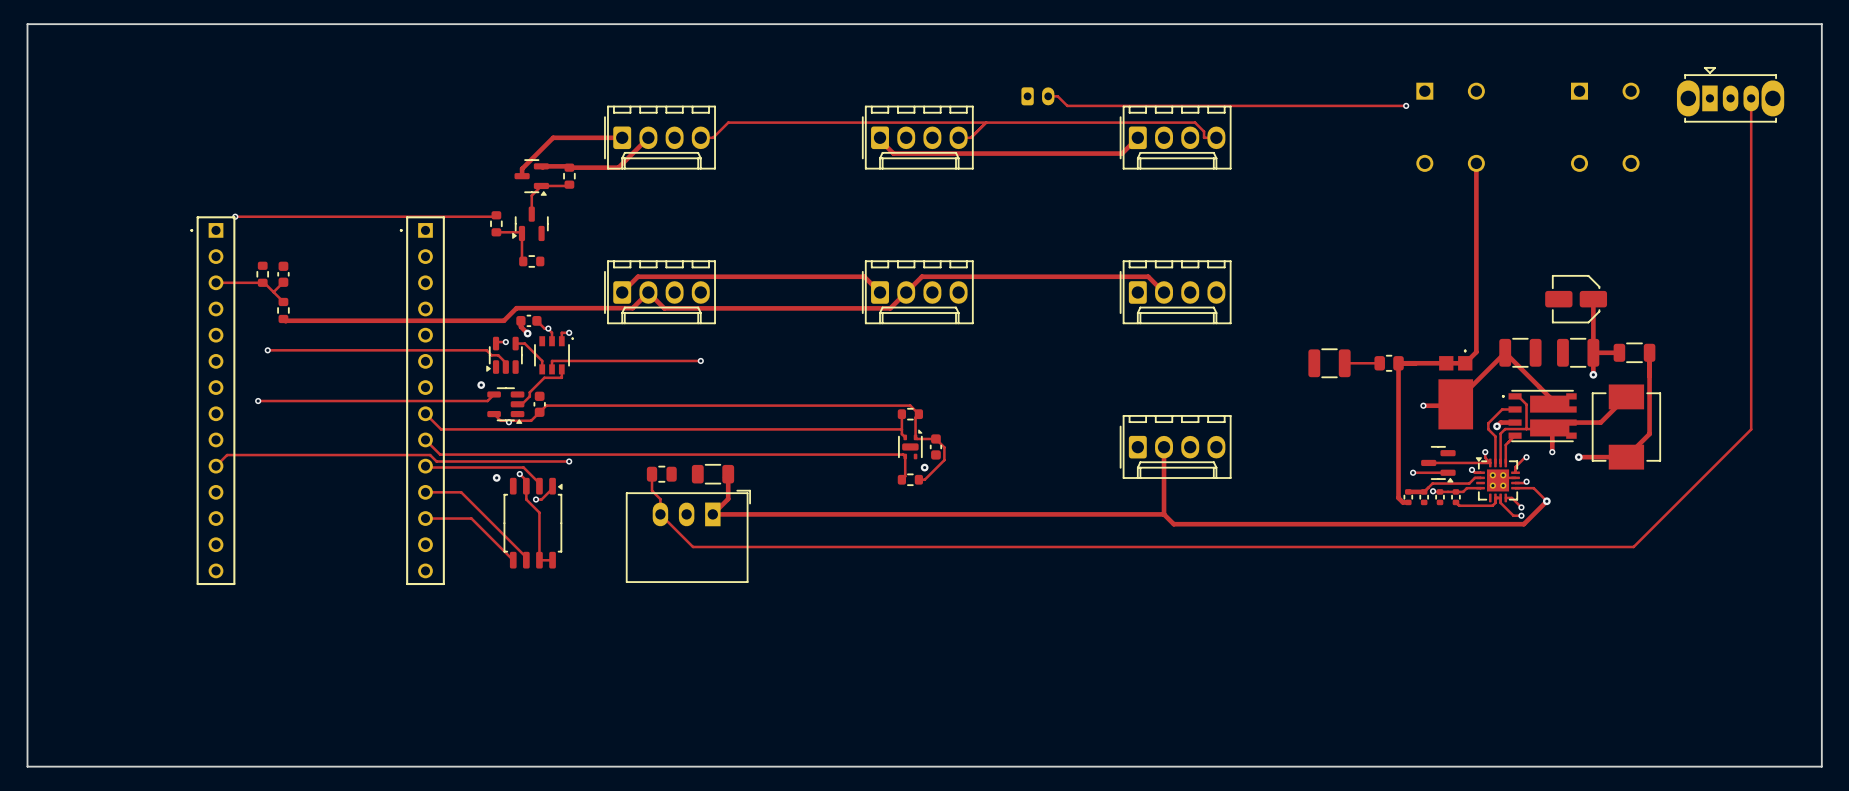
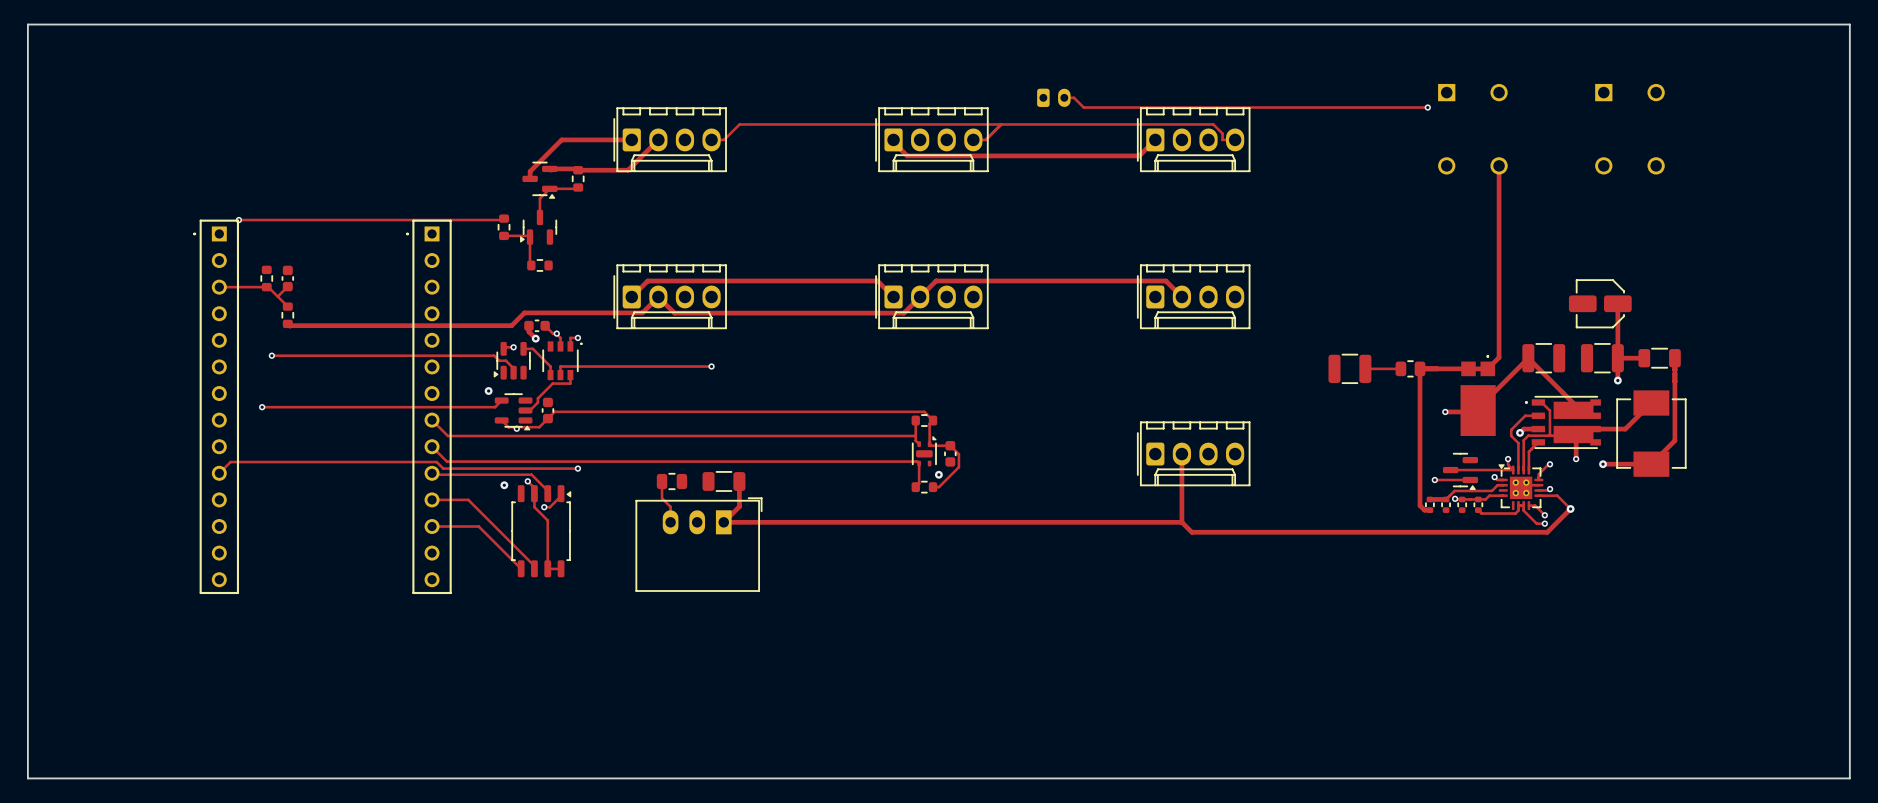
part: (1730, 94) -> none
track: (1751, 98) (1751, 429) (1633, 546) (693, 546) (660, 514) -> none

